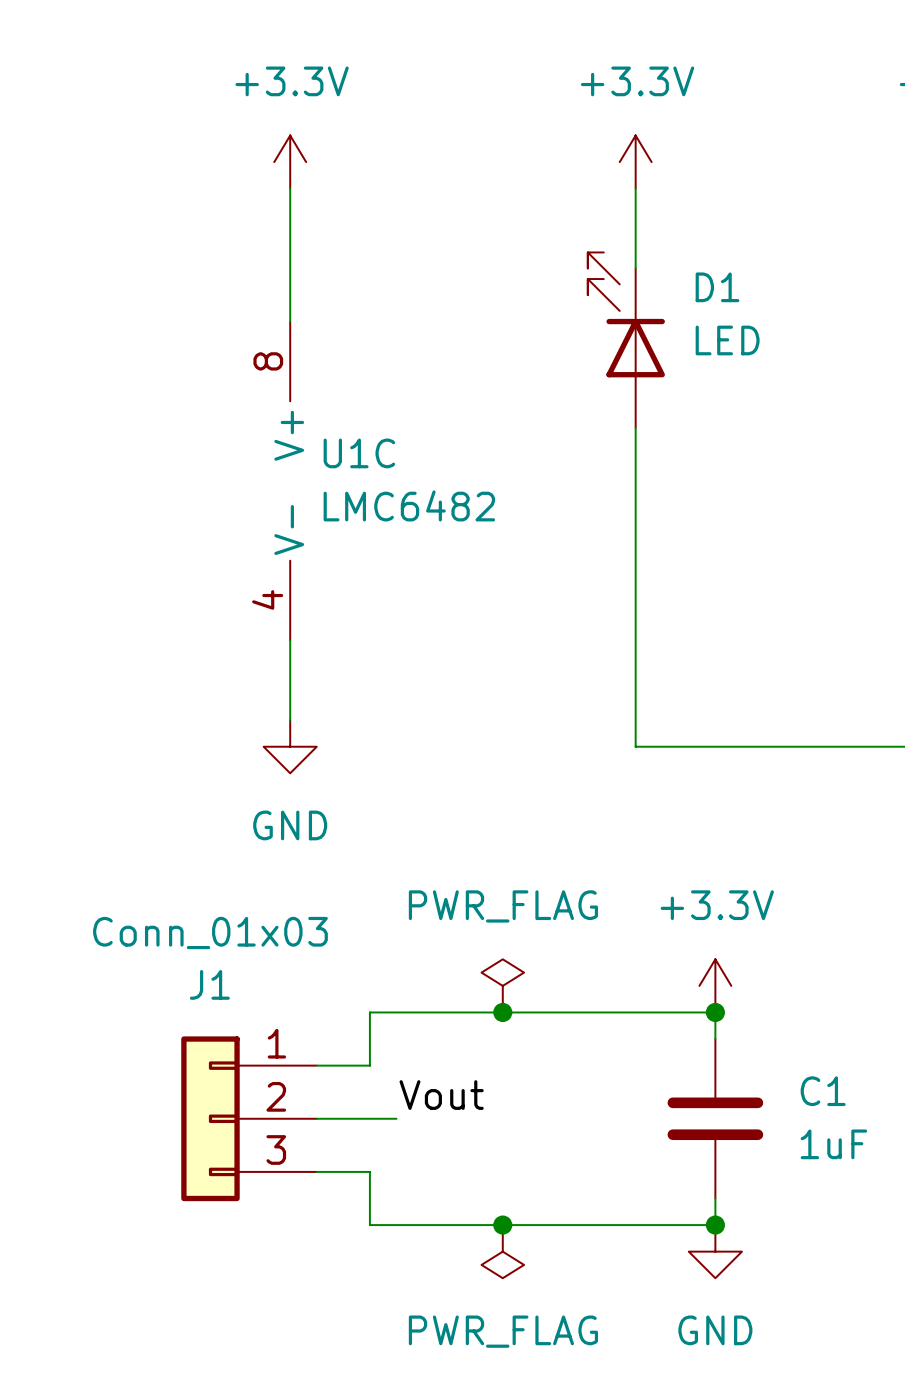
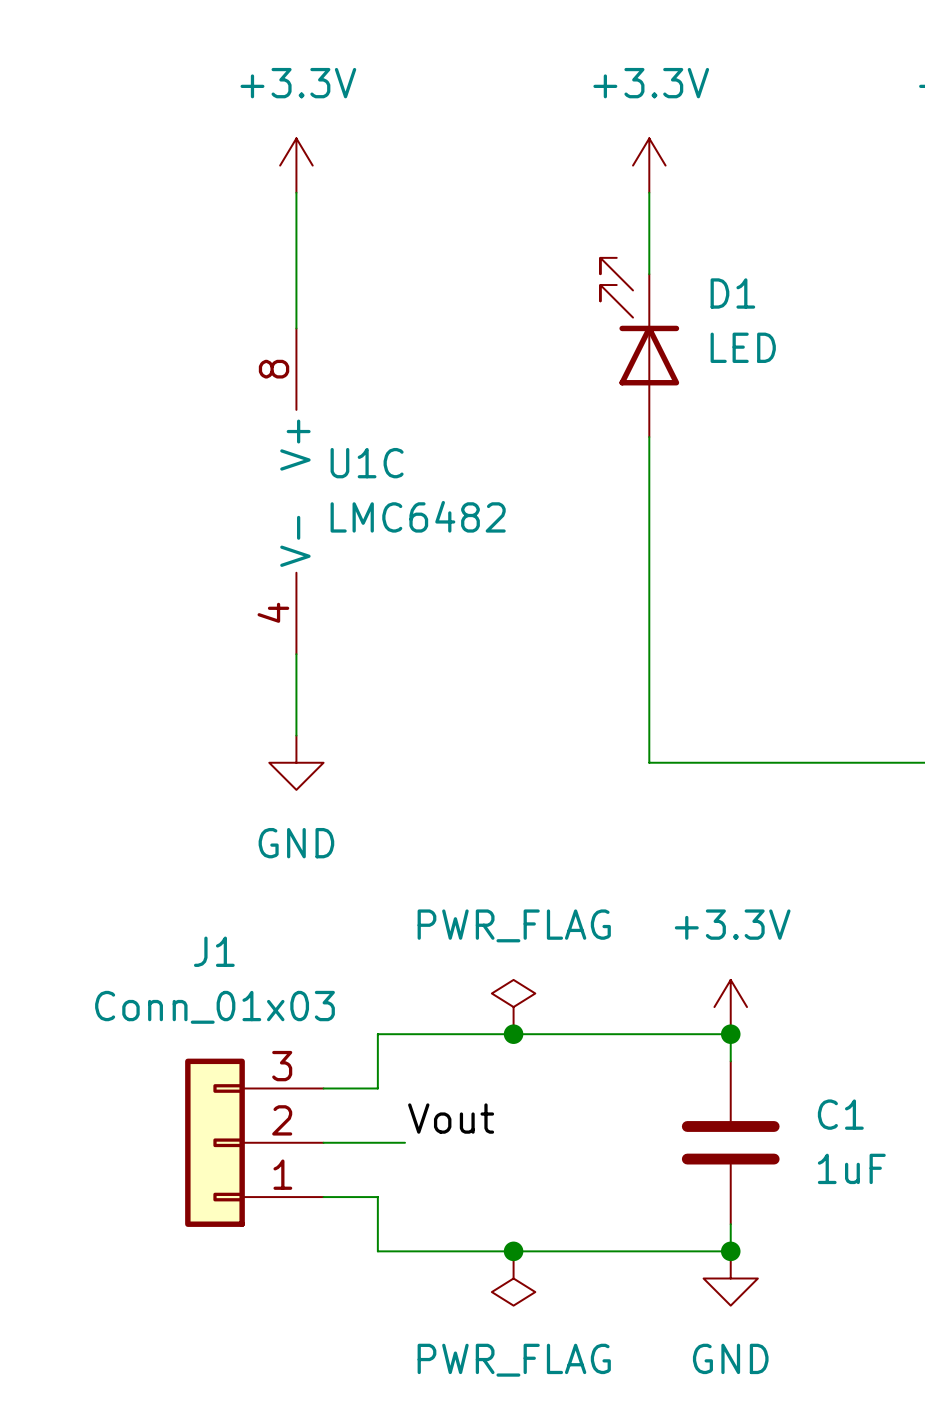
J1 value position: Conn_01x03 (210, 933) -> Conn_01x03 (214, 1007)
J1 name position: J1 (209, 984) -> J1 (214, 951)
J1 flip: as is (210, 1118) -> up-down (214, 1142)

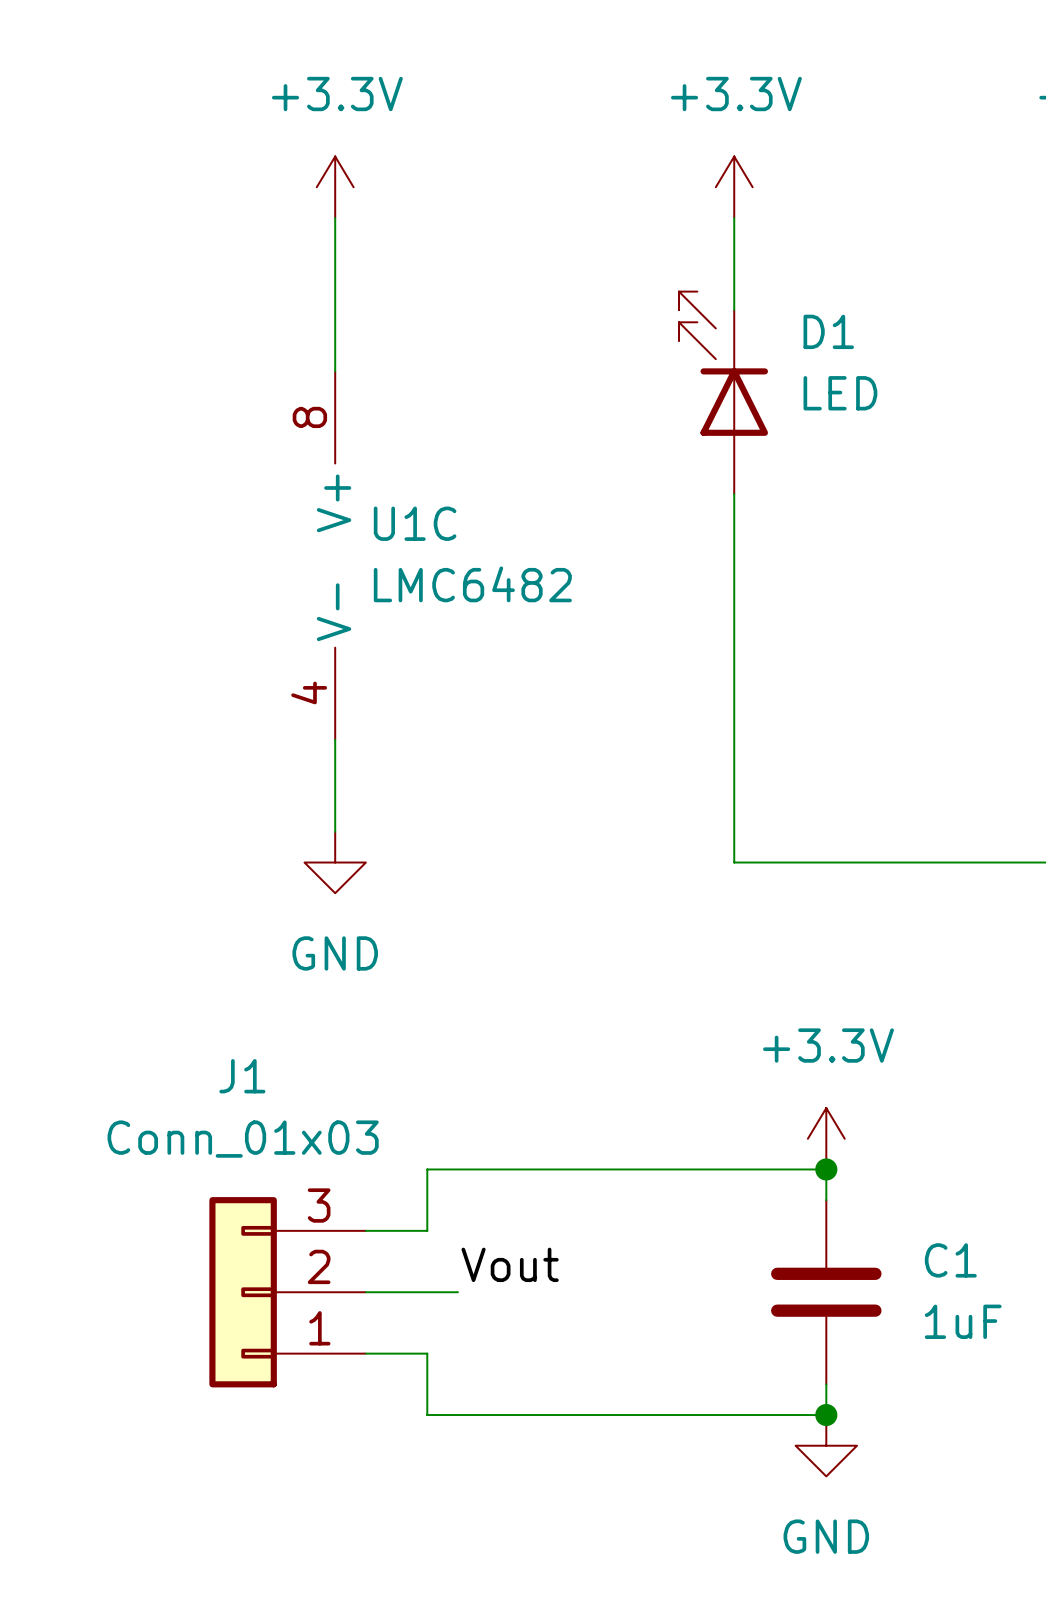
power symbol: PWR_FLAG (513, 1007) -> none
junction: (513, 1034) -> none
junction: (513, 1251) -> none
power symbol: PWR_FLAG (513, 1278) -> none

